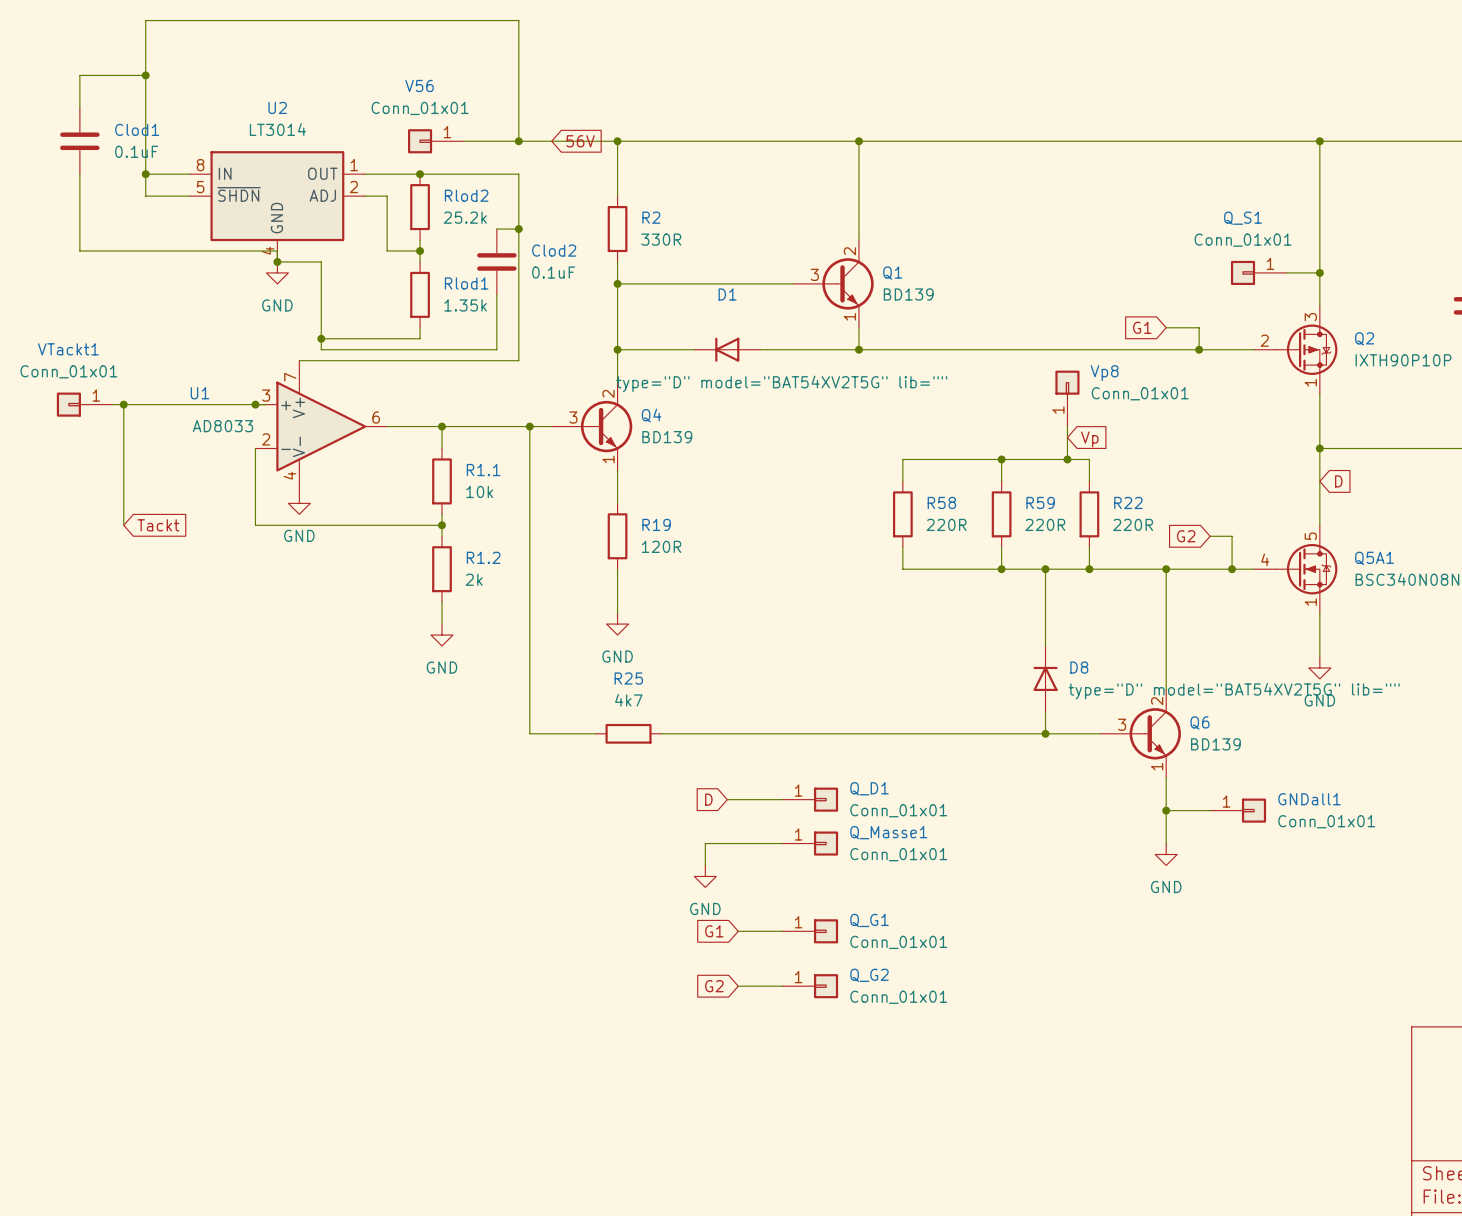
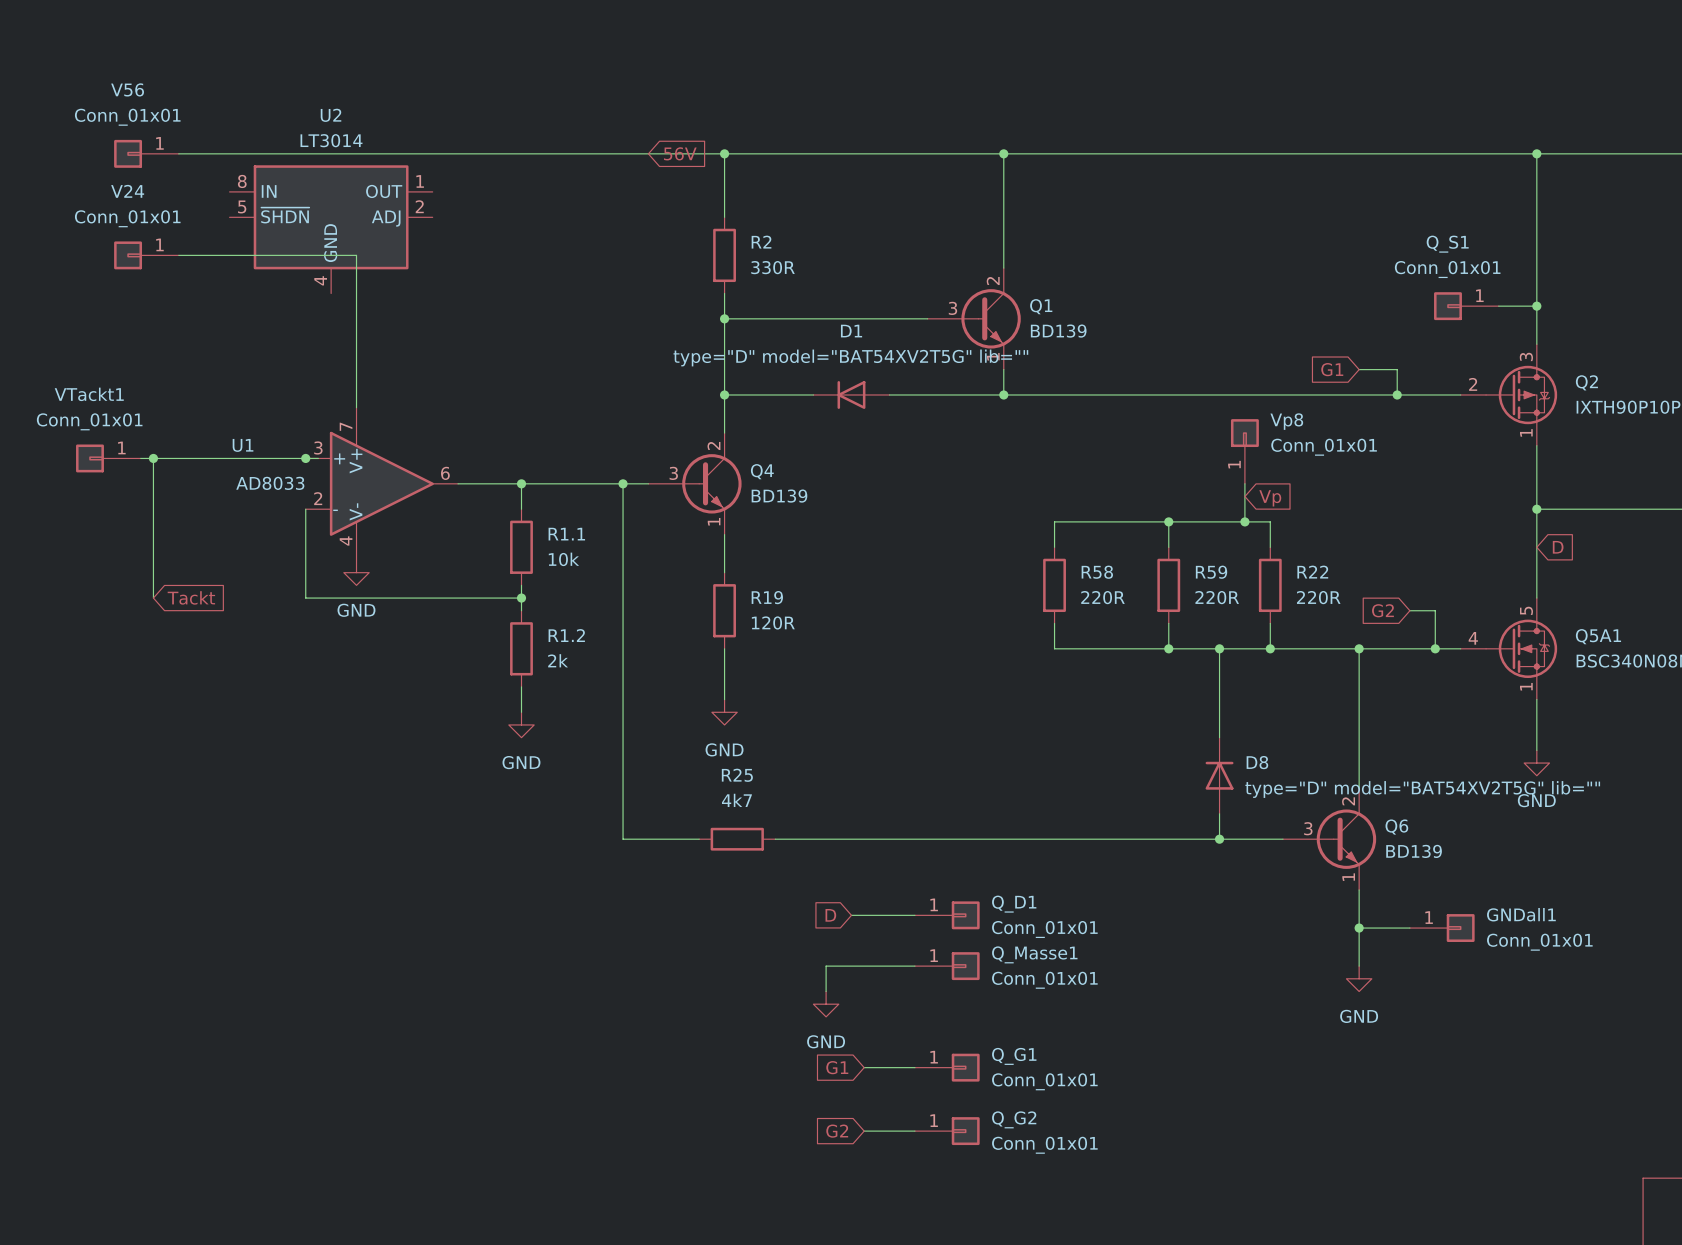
wire: (145, 75) (79, 75) (79, 108) -> none
junction: (145, 75) -> none
Clod1: 0.1uF (79, 141) -> none
wire: none -> (178, 153) (546, 153)
V56 position: (435, 141) -> (146, 153)
wire: (518, 141) (518, 20) (145, 20) (145, 196) (189, 196) -> none
junction: (518, 141) -> none
wire: (79, 174) (79, 250) (277, 250) (277, 261) (321, 261) (321, 349) (496, 349) (496, 294) -> none
wire: (145, 174) (189, 174) -> none
junction: (145, 174) -> none
wire: (365, 174) (518, 174) (518, 360) (299, 360) -> (178, 255) (356, 255) (356, 407)
junction: (420, 174) -> none
wire: (365, 196) (387, 196) (387, 250) (420, 250) -> none
Rlod2: 25.2k (420, 207) -> none
V24: none -> Conn_01x01 (146, 255)
wire: (496, 229) (518, 229) -> none
junction: (518, 229) -> none
wire: (420, 240) (420, 261) -> none
junction: (420, 250) -> none
junction: (277, 261) -> none
Clod2: 0.1uF (496, 261) -> none
power symbol: GND (277, 272) -> none
Rlod1: 1.35k (420, 294) -> none
wire: (420, 327) (420, 338) (321, 338) -> none
junction: (321, 338) -> none
D1 value position: type="D" model="BAT54XV2T5G" lib="" (781, 383) -> type="D" model="BAT54XV2T5G" lib="" (850, 357)

